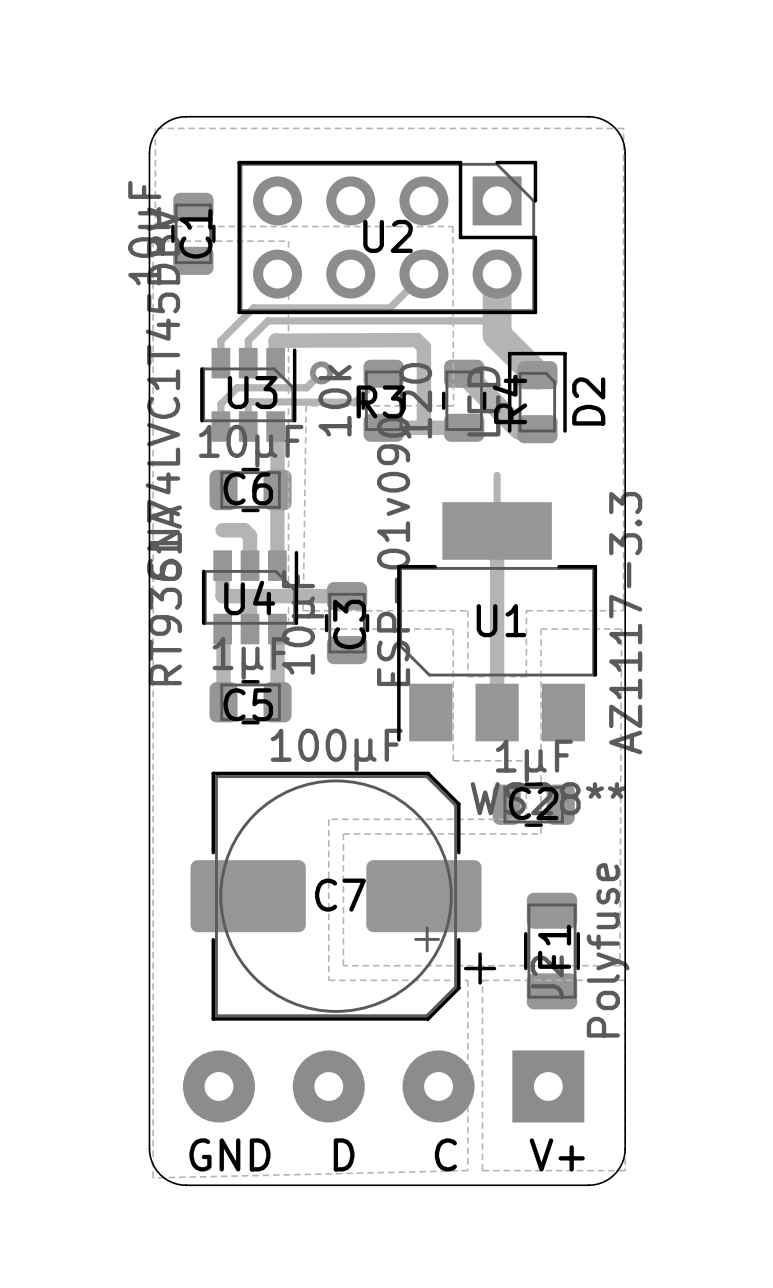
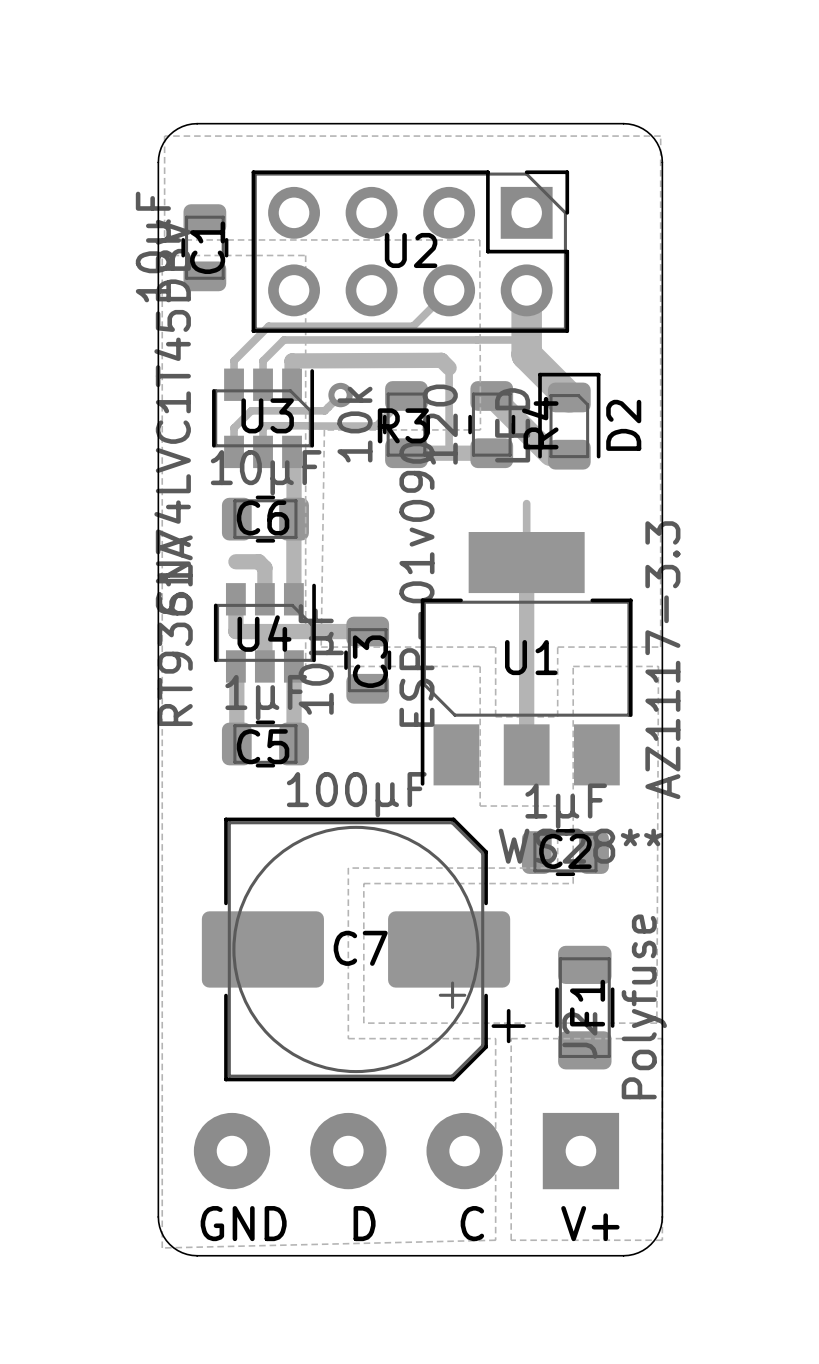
track width: thick (423, 347) (423, 427) -> thin (449, 367) (449, 453)

